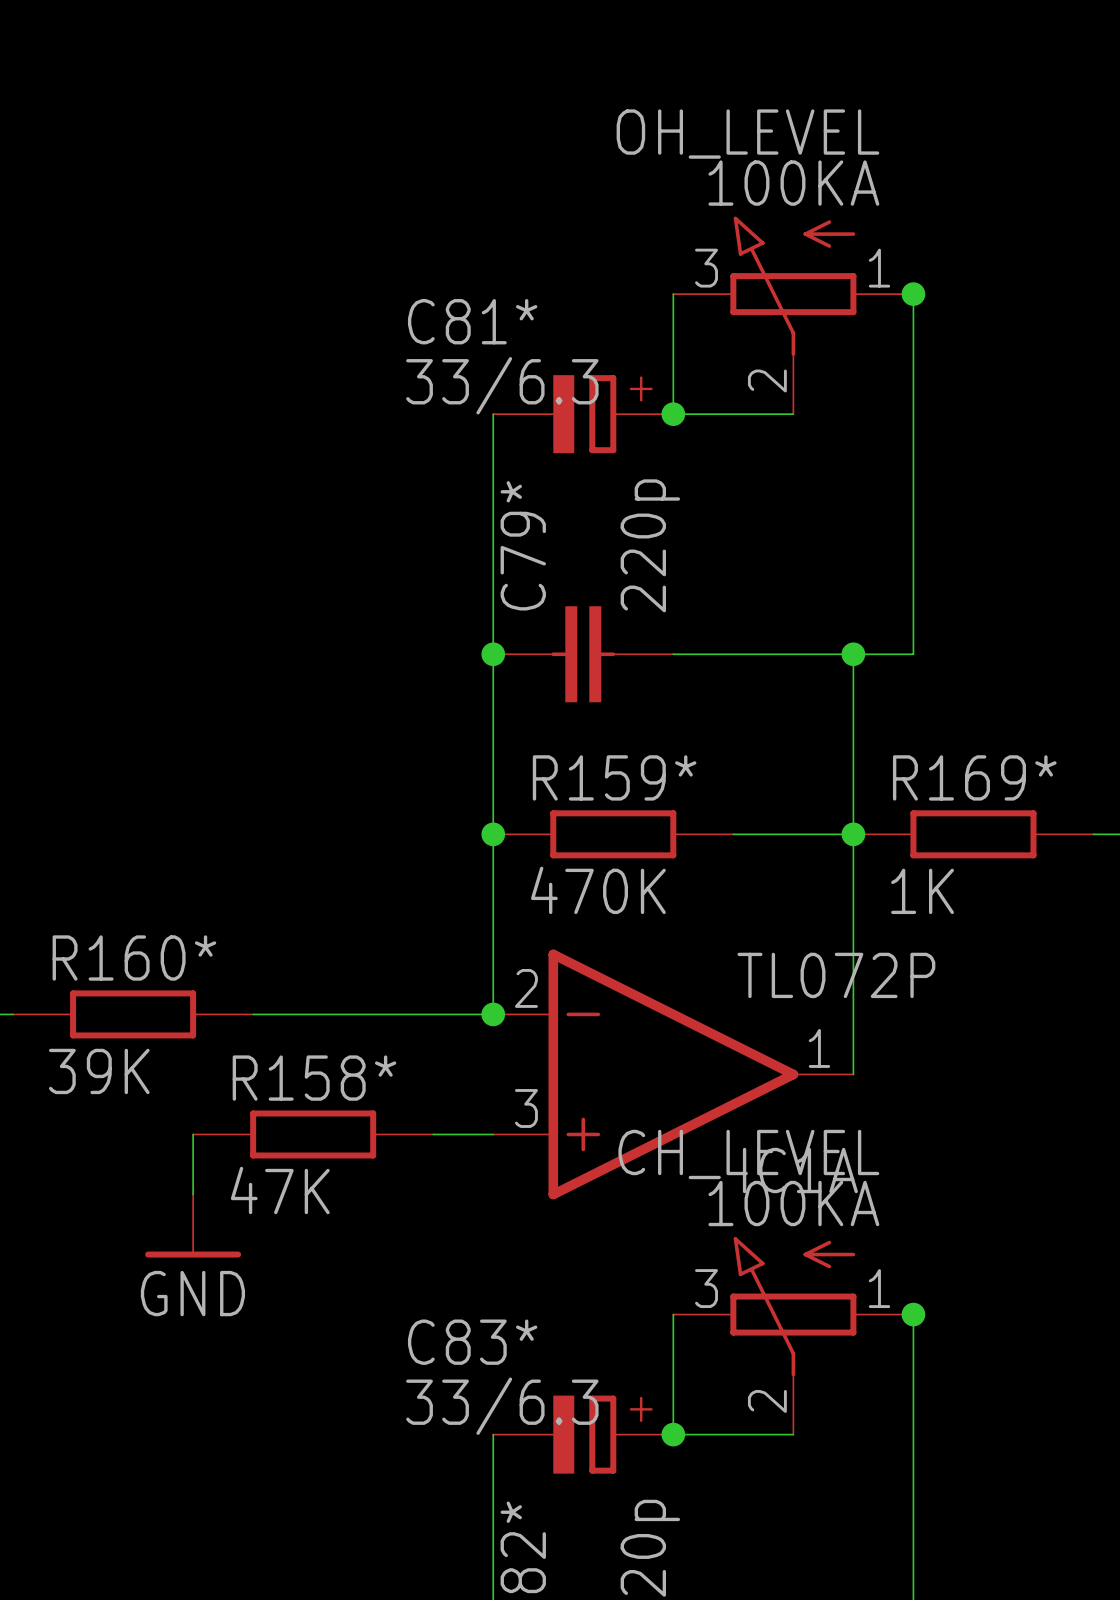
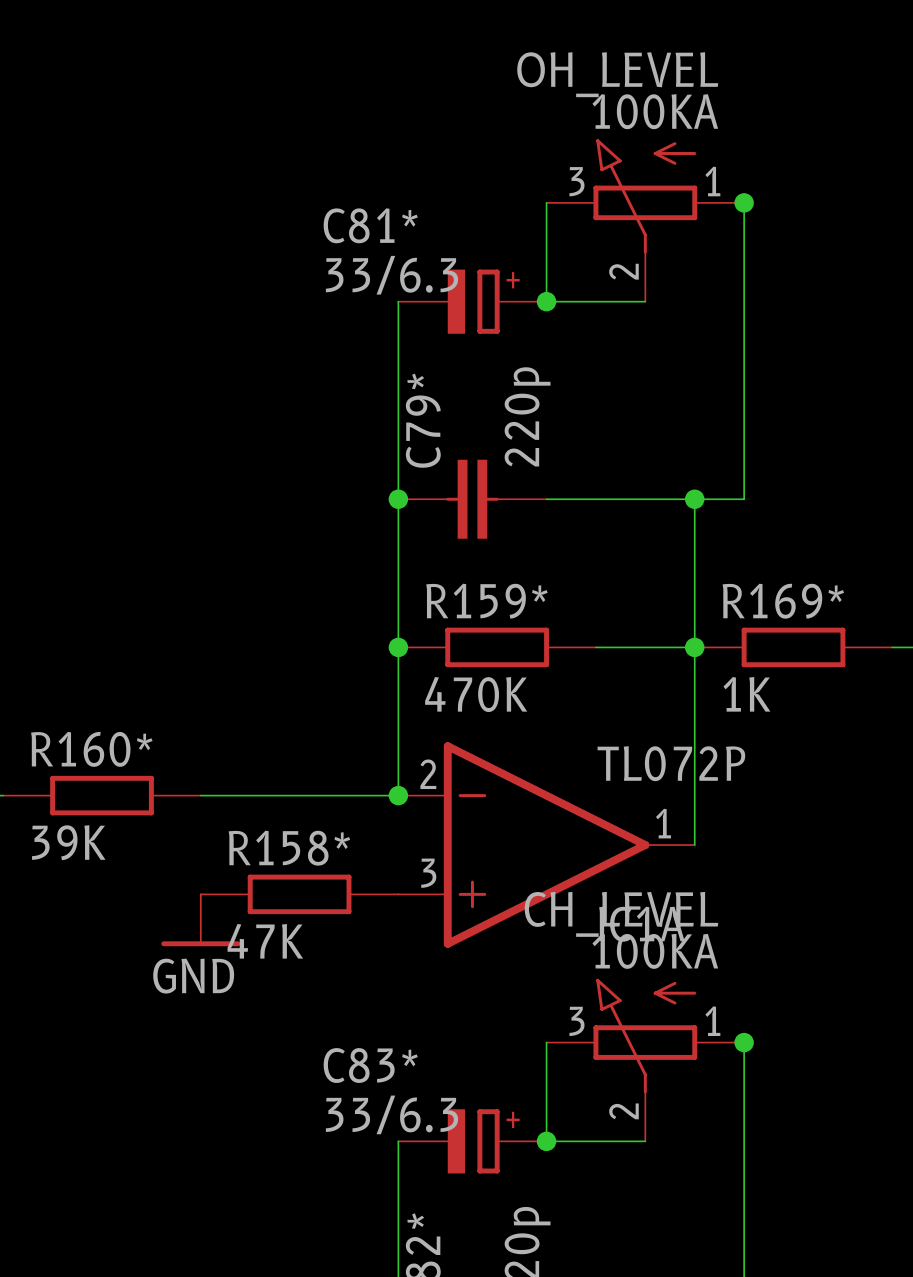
wire: (193, 1134) (193, 1194) -> none
R158* position: (313, 1134) -> (299, 894)
power symbol position: GND (193, 1226) -> GND (200, 920)

